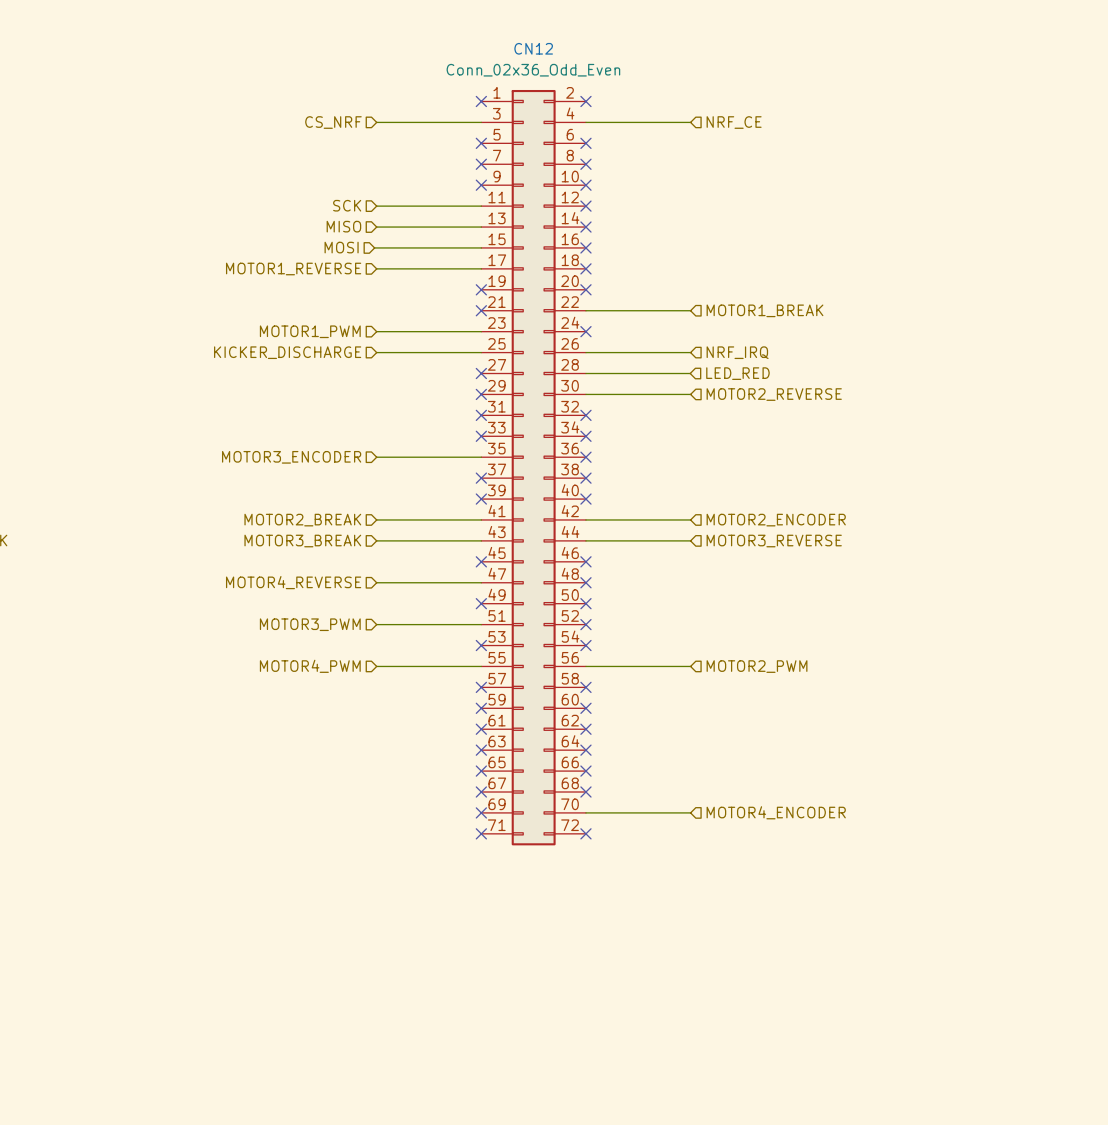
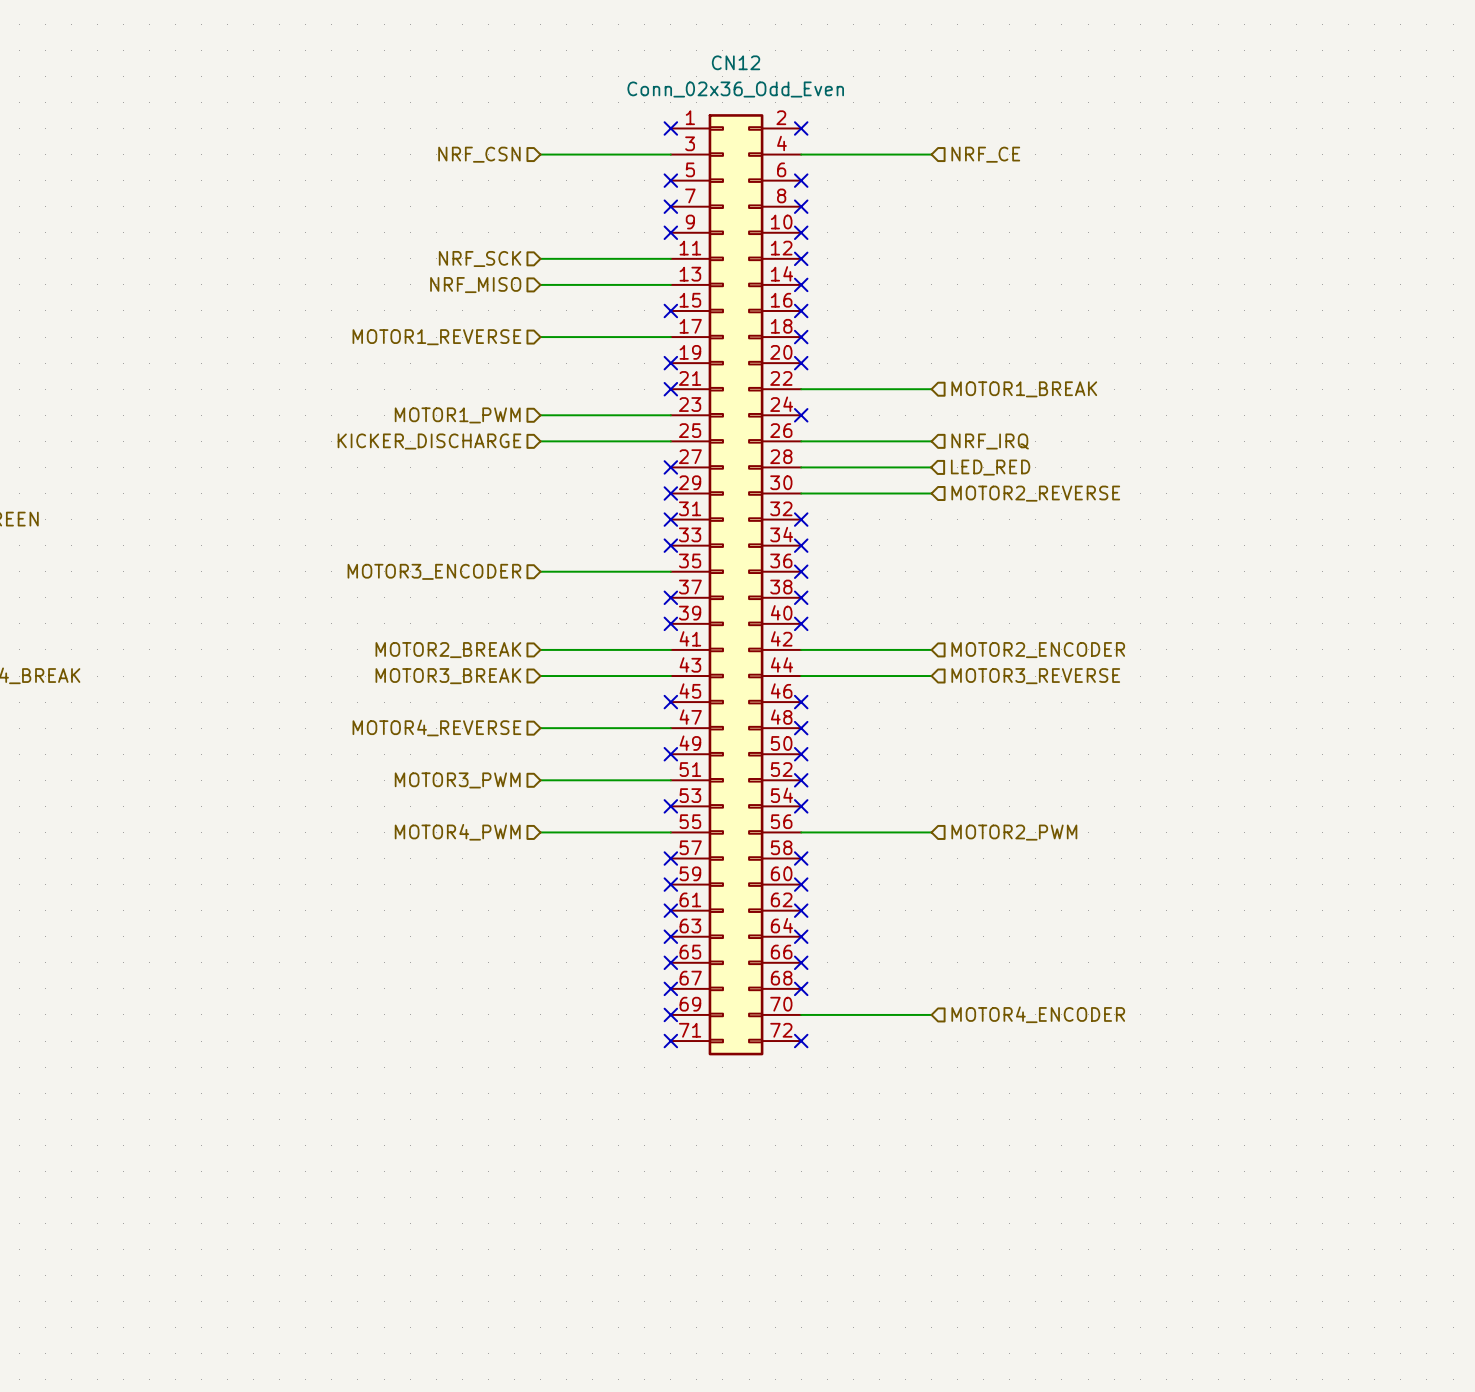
hierarchical label: CS_NRF (333, 122) -> NRF_CSN (479, 154)
hierarchical label: SCK (347, 205) -> NRF_SCK (480, 258)
hierarchical label: MISO (343, 226) -> NRF_MISO (475, 285)
hierarchical label: MOSI (341, 247) -> none
wire: (374, 247) (481, 247) -> none
no-connect mark: none -> (670, 310)

